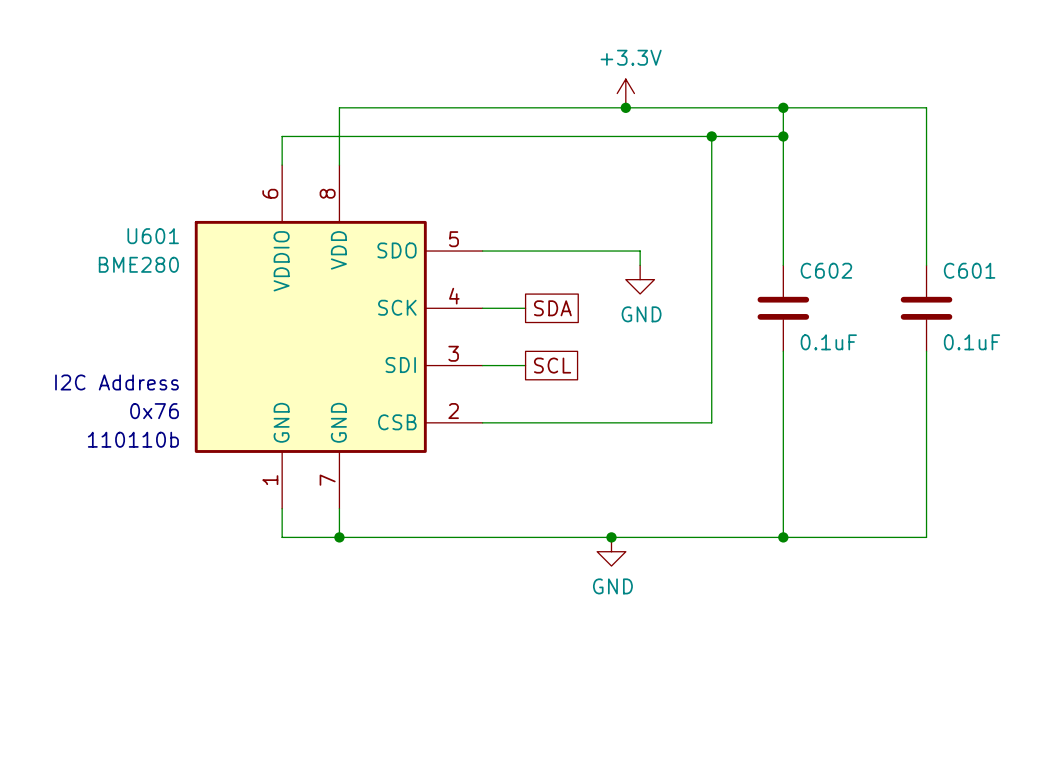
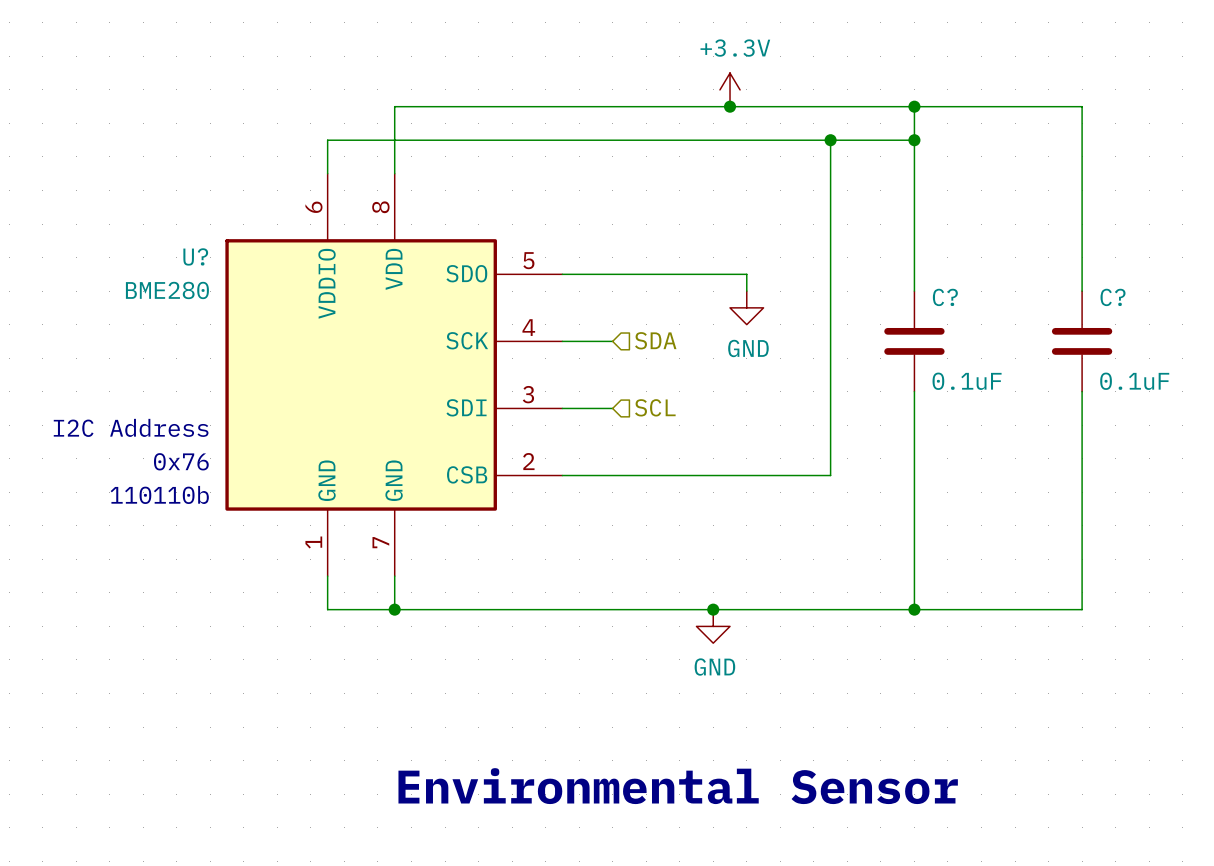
U601 name: U601 (153, 236) -> U? (195, 256)
C602 name: C602 (826, 270) -> C? (945, 297)
C601 name: C601 (969, 270) -> C? (1113, 297)
hierarchical label: none -> SDA (655, 340)
global label: SDA (552, 308) -> none
global label: SCL (552, 365) -> none
hierarchical label: none -> SCL (655, 407)
text: none -> Environmental Sensor (678, 786)

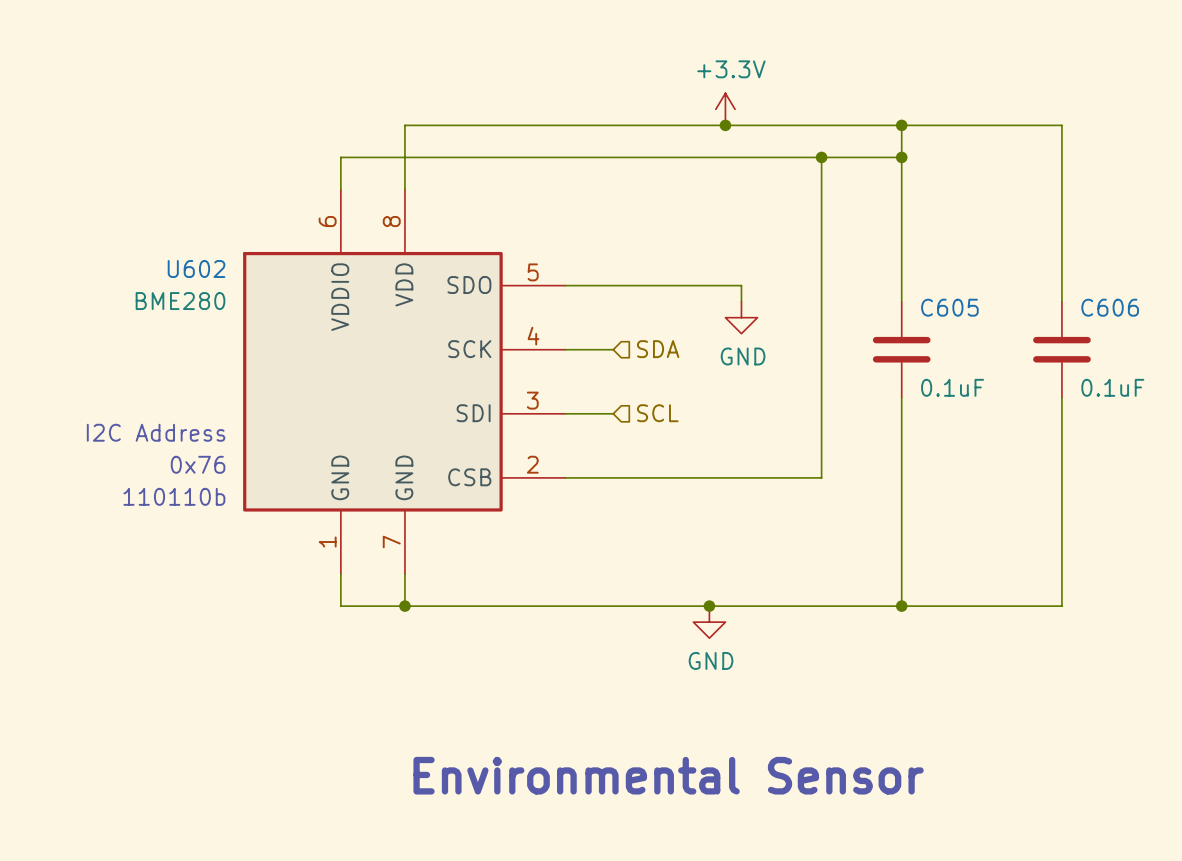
U? name: U? (195, 256) -> U602 (196, 269)
C? name: C? (945, 297) -> C605 (949, 307)
C? name: C? (1113, 297) -> C606 (1110, 307)

